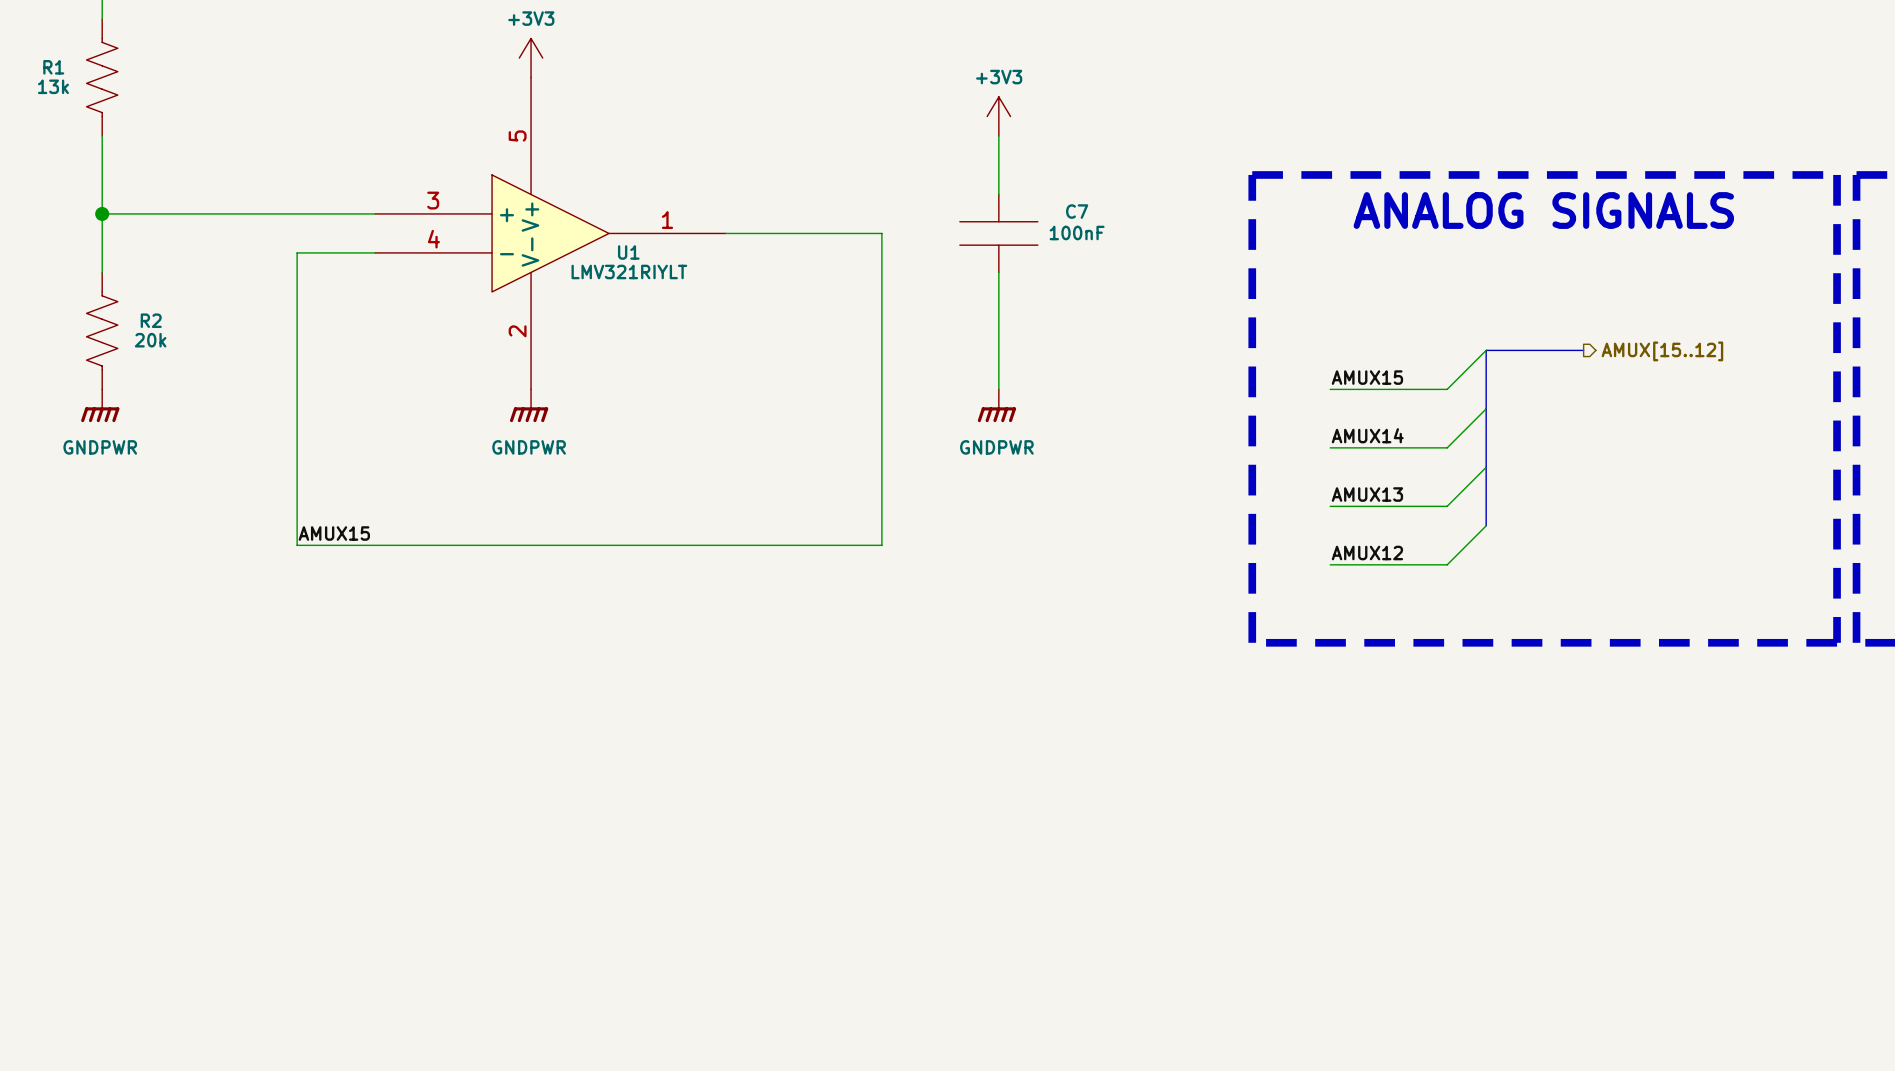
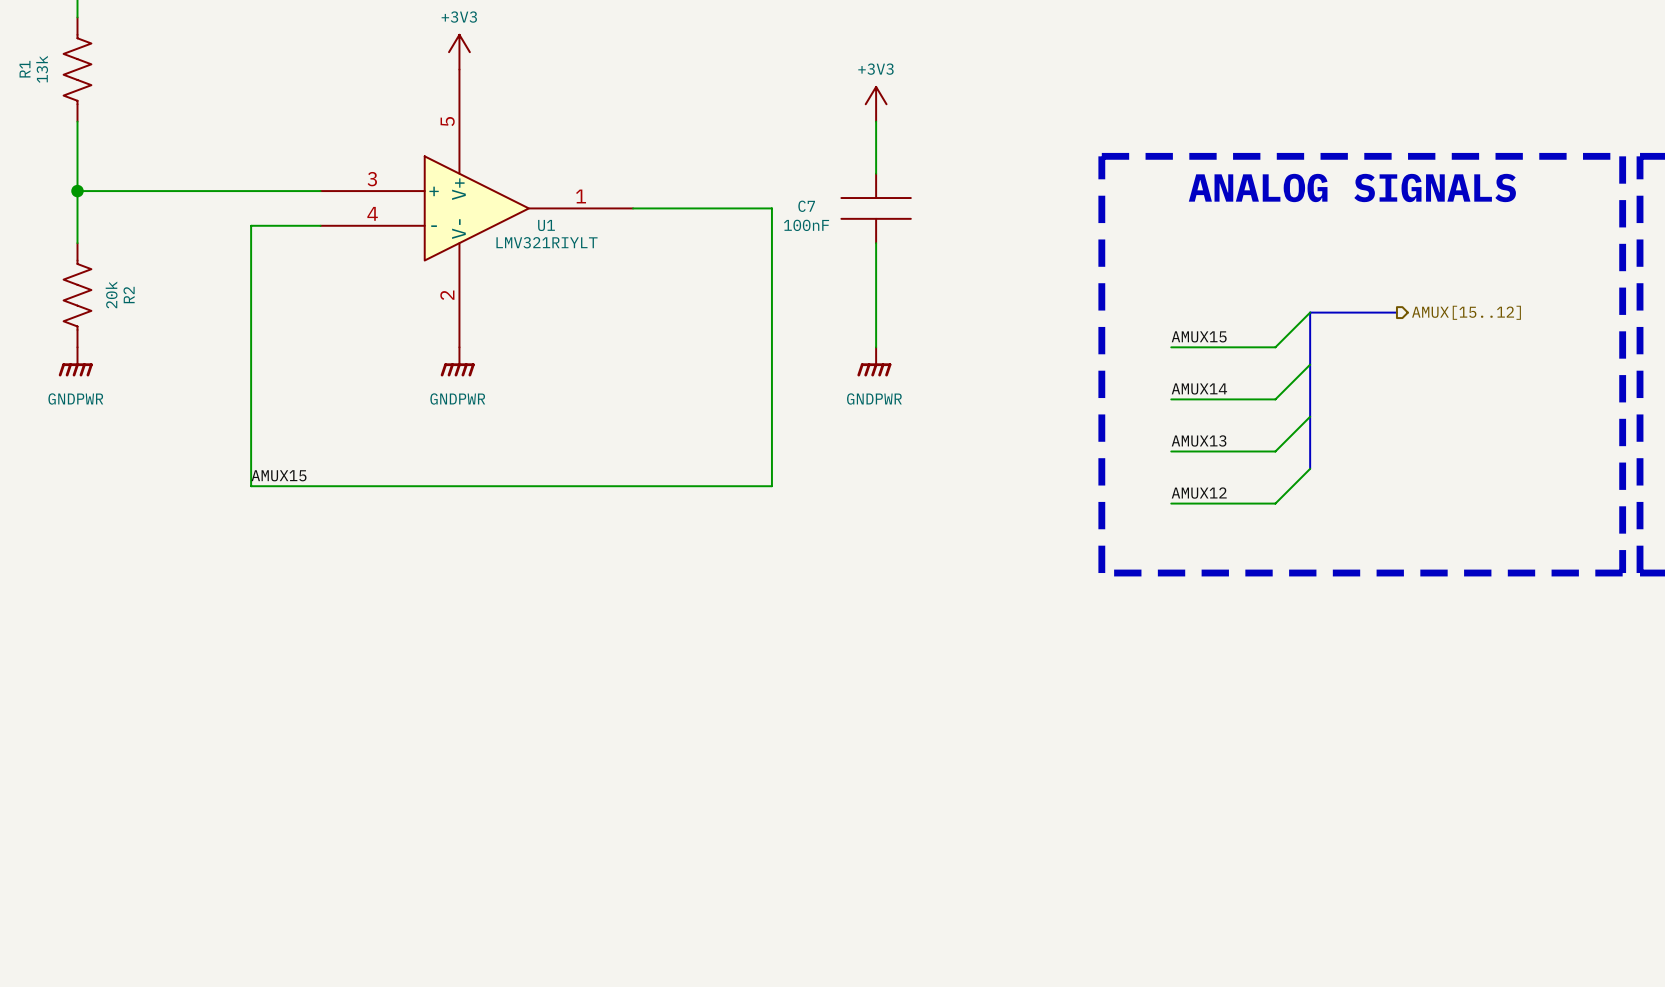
R1 name rotation: 0° (53, 67) -> 90° counterclockwise (25, 69)
R1 value rotation: 0° (53, 86) -> 90° counterclockwise (42, 69)
C7 name position: C7 (1077, 211) -> C7 (806, 206)
C7 value position: 100nF (1077, 232) -> 100nF (806, 225)
R2 name rotation: 0° (151, 320) -> 90° counterclockwise (129, 295)
R2 value rotation: 0° (150, 340) -> 90° counterclockwise (111, 294)

